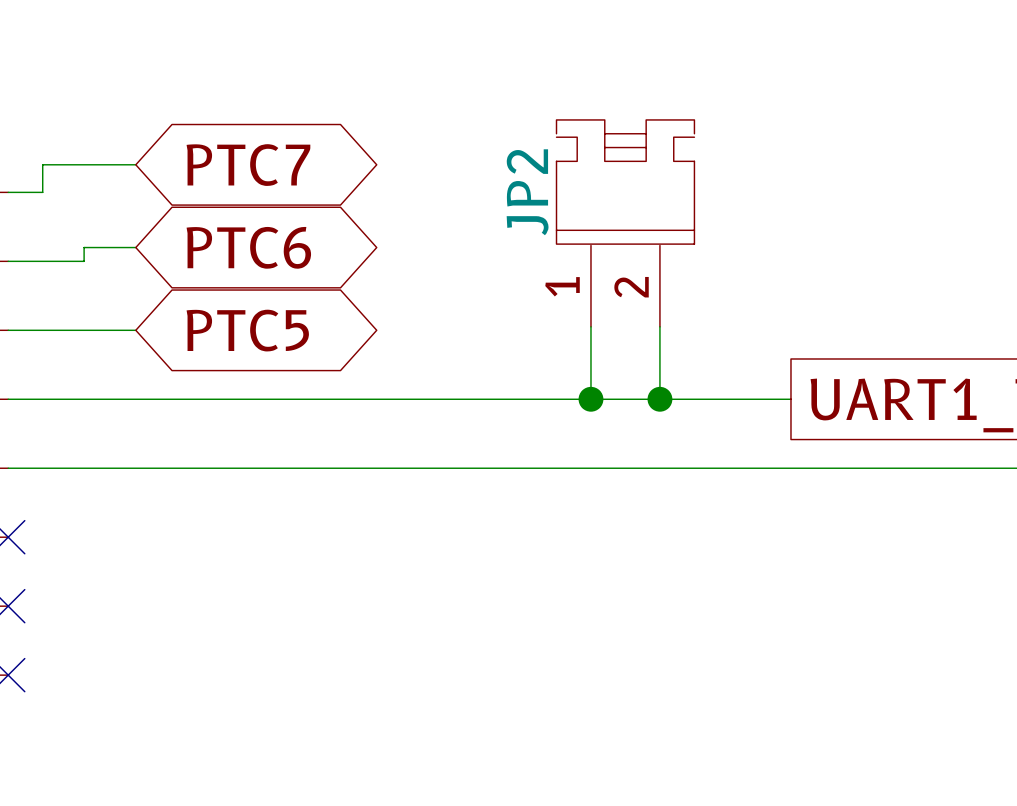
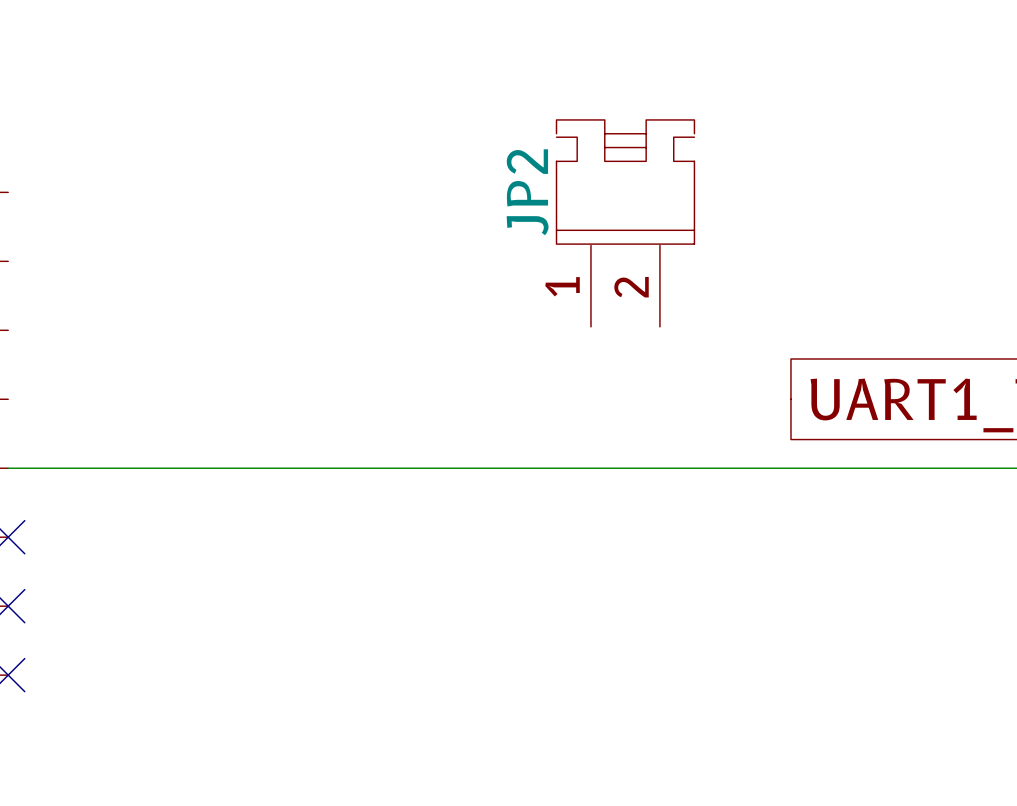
wire: (135, 164) (42, 164) (42, 192) (8, 192) -> none
global label: PTC7 (248, 165) -> none
wire: (135, 247) (84, 247) (84, 261) (8, 261) -> none
global label: PTC6 (248, 247) -> none
wire: (590, 326) (590, 399) -> none
wire: (659, 326) (659, 399) -> none
wire: (8, 330) (135, 330) -> none
global label: PTC5 (247, 330) -> none
wire: (8, 399) (790, 399) -> none
junction: (590, 399) -> none
junction: (659, 399) -> none

